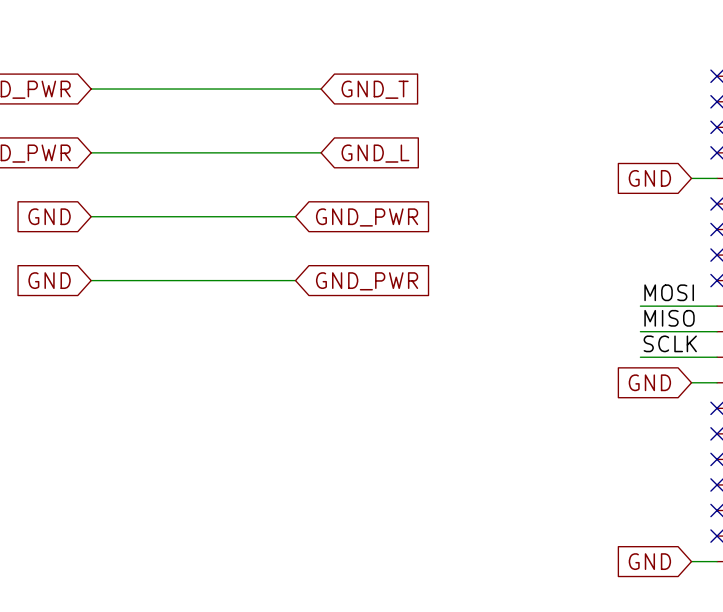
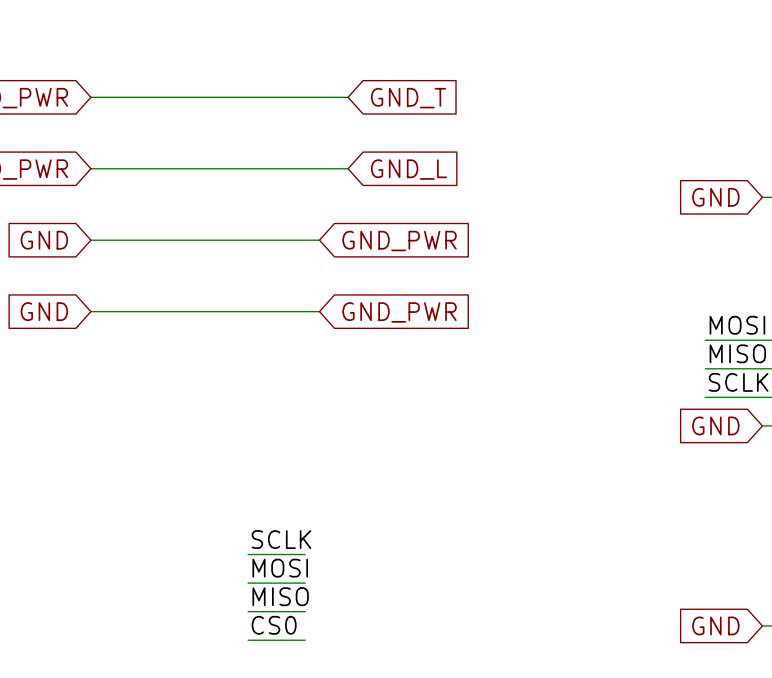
label: none -> SCLK (281, 539)
wire: none -> (248, 554) (305, 554)
label: none -> MOSI (280, 568)
wire: none -> (248, 583) (305, 583)
label: none -> MISO (280, 596)
wire: none -> (248, 611) (305, 611)
label: none -> CS0 (274, 625)
wire: none -> (248, 640) (305, 640)

